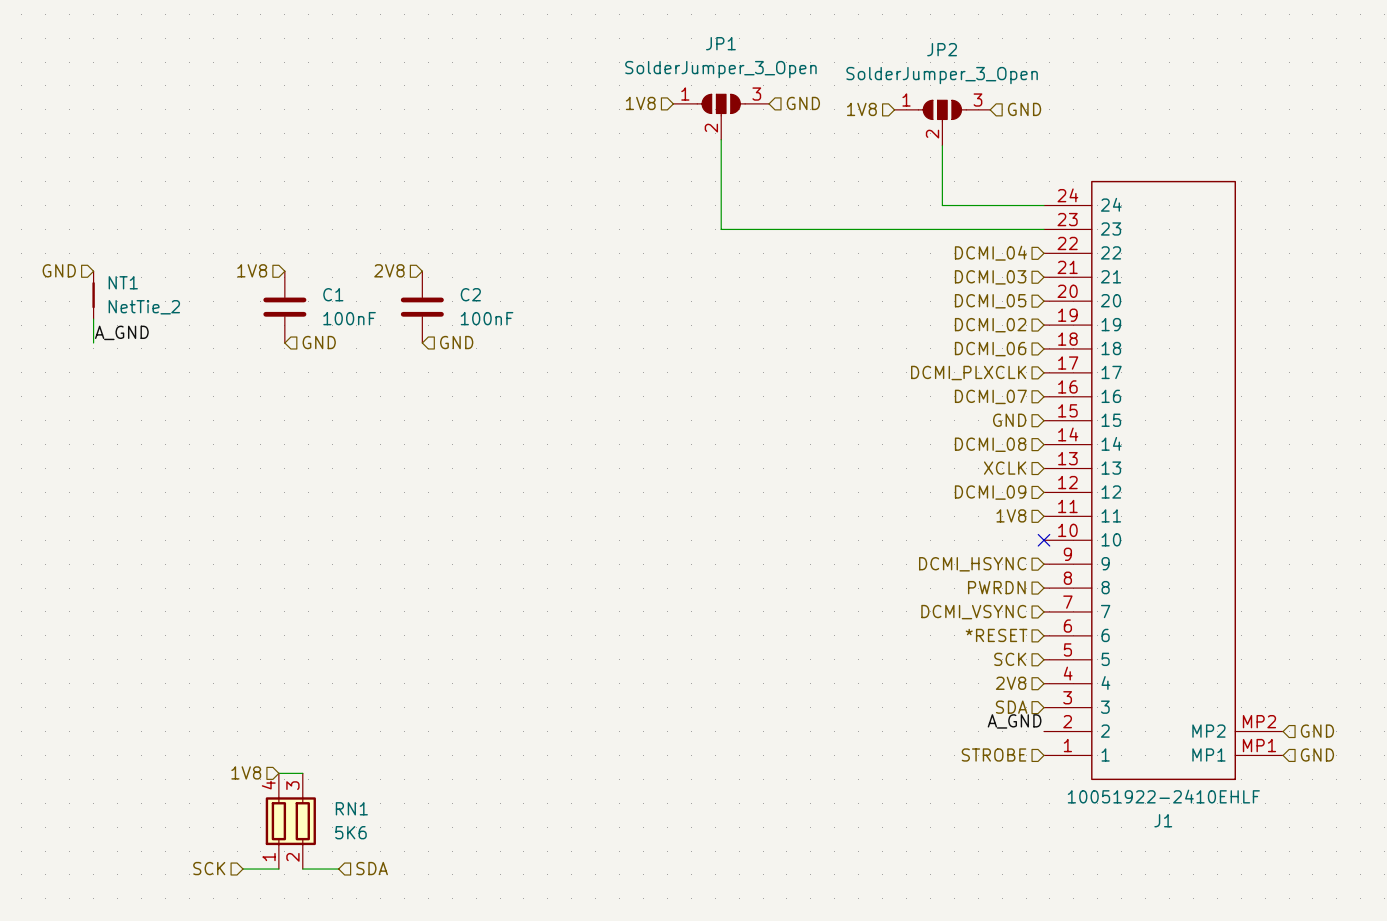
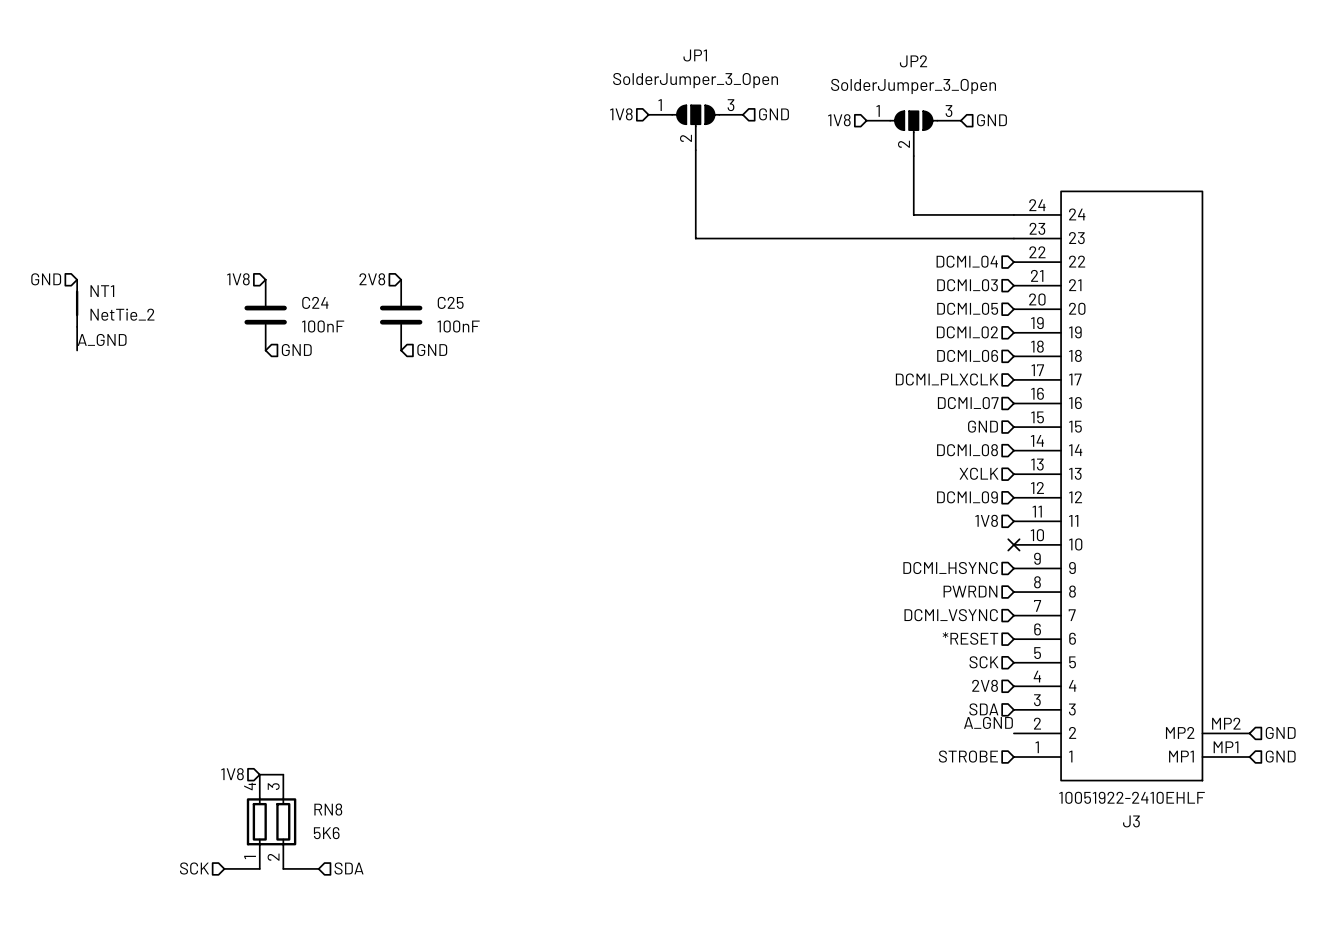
C1 name: C1 (333, 294) -> C24 (315, 302)
C2 name: C2 (470, 294) -> C25 (450, 302)
RN1 name: RN1 (351, 808) -> RN8 (328, 809)
J1 name: J1 (1163, 820) -> J3 (1131, 821)

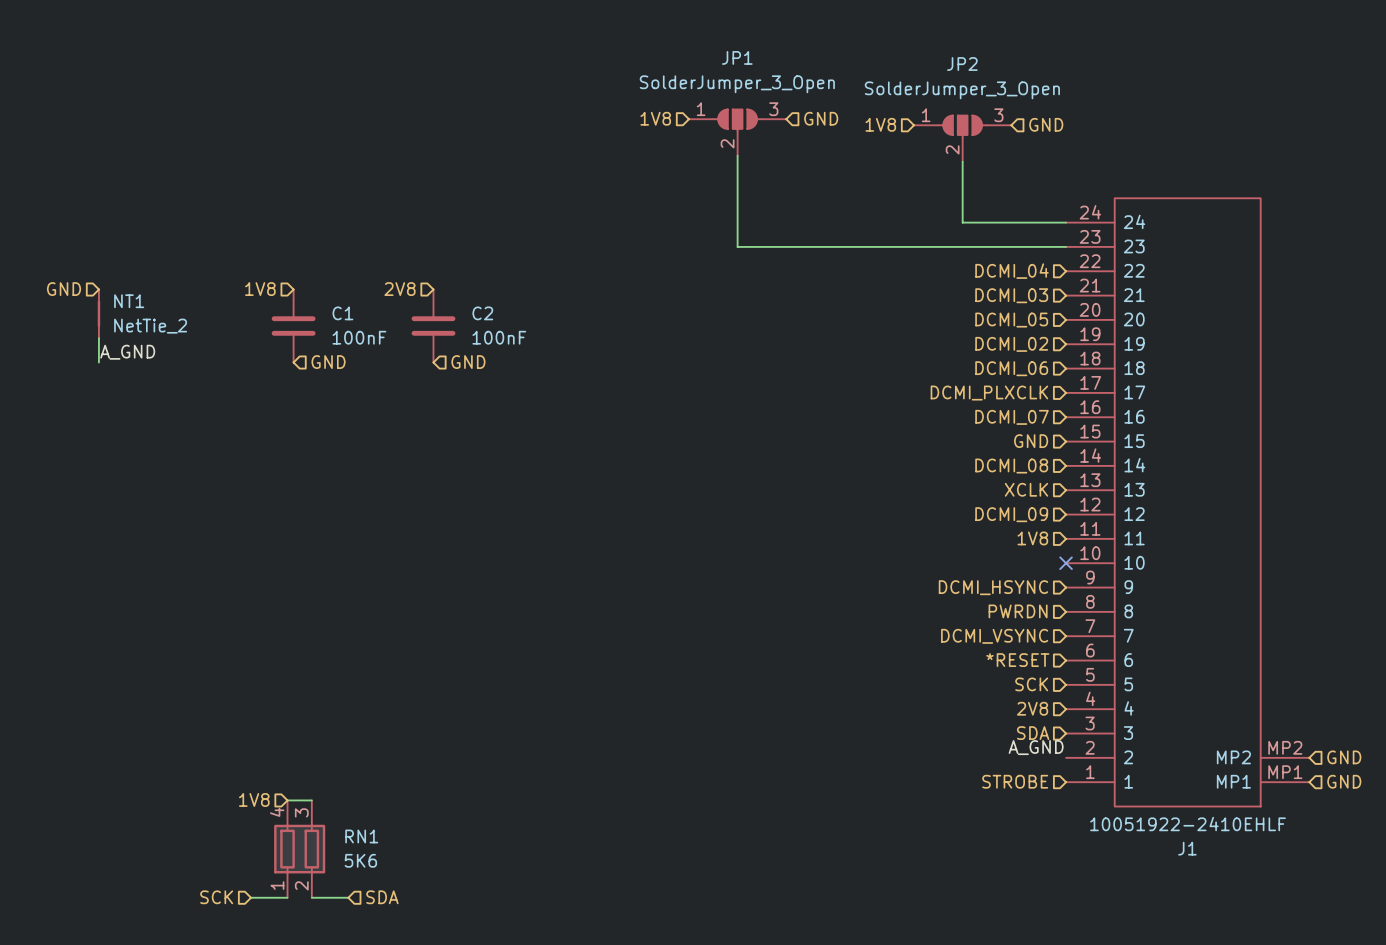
C24 name: C24 (315, 302) -> C1 (342, 313)
C25 name: C25 (450, 302) -> C2 (482, 313)
RN8 name: RN8 (328, 809) -> RN1 (361, 836)
J3 name: J3 (1131, 821) -> J1 (1187, 848)

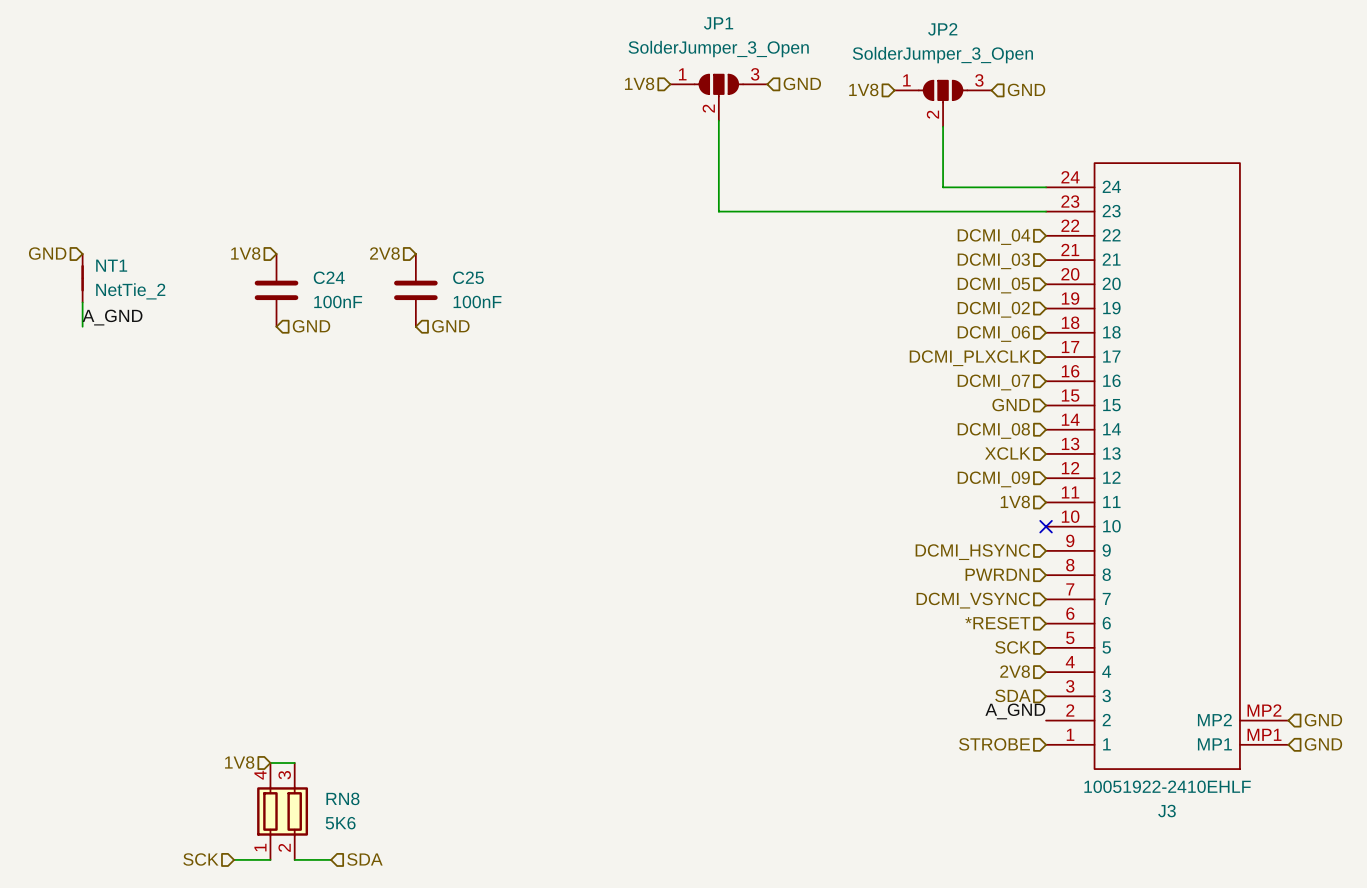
C1 name: C1 (342, 313) -> C24 (329, 277)
C2 name: C2 (482, 313) -> C25 (468, 277)
RN1 name: RN1 (361, 836) -> RN8 (342, 798)
J1 name: J1 (1187, 848) -> J3 (1167, 811)

